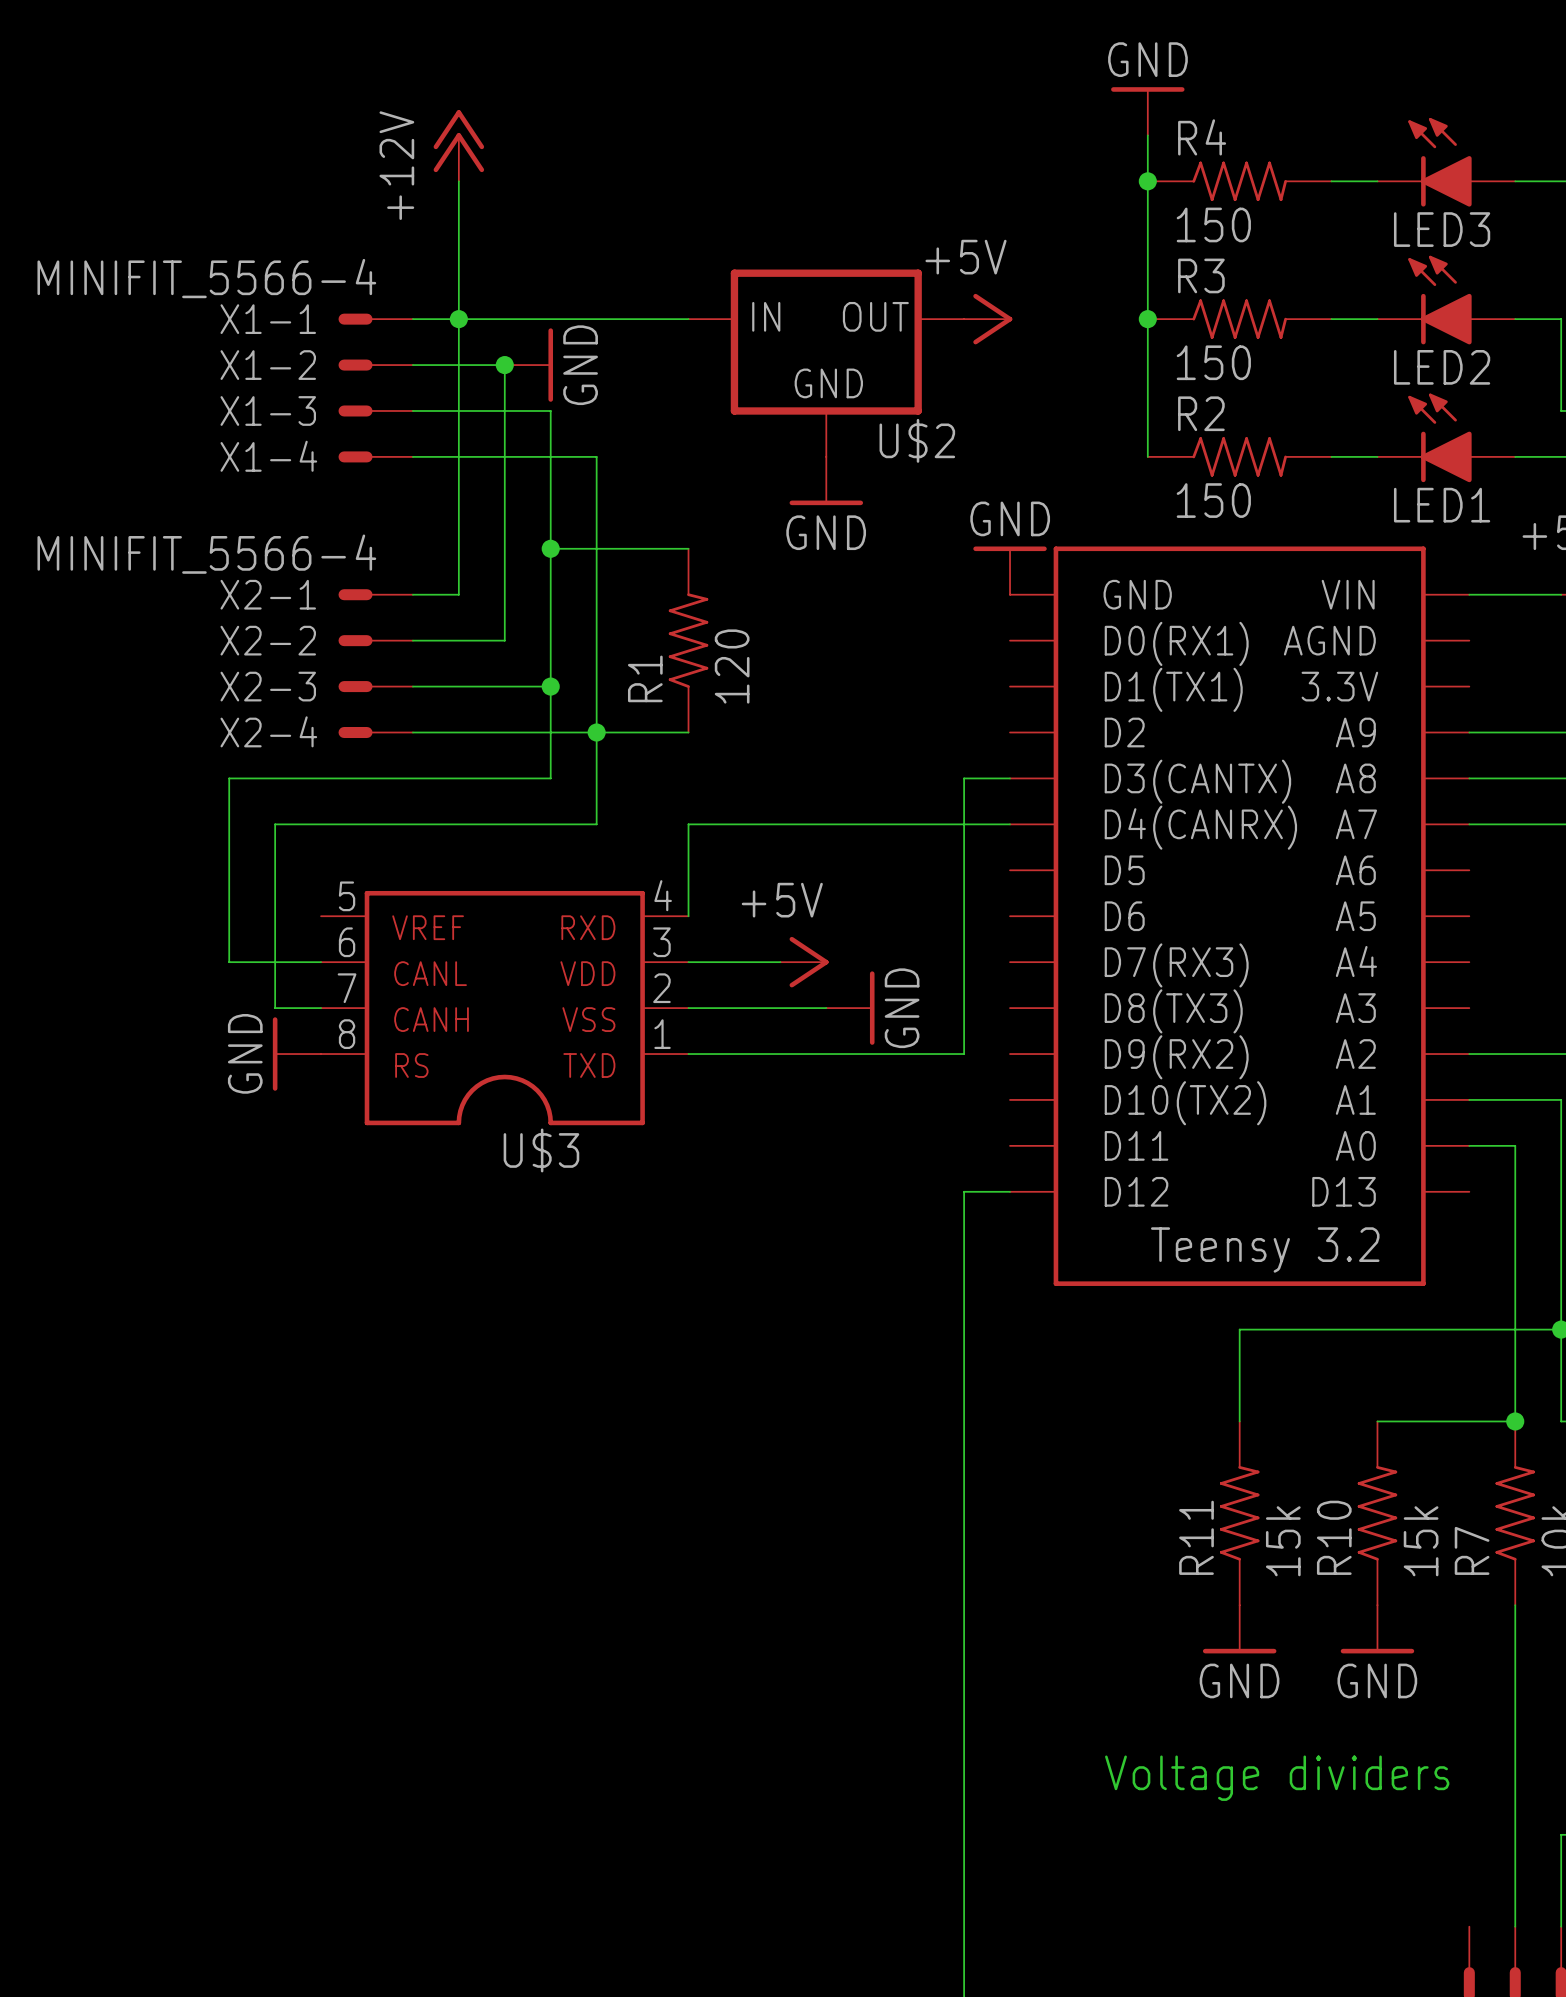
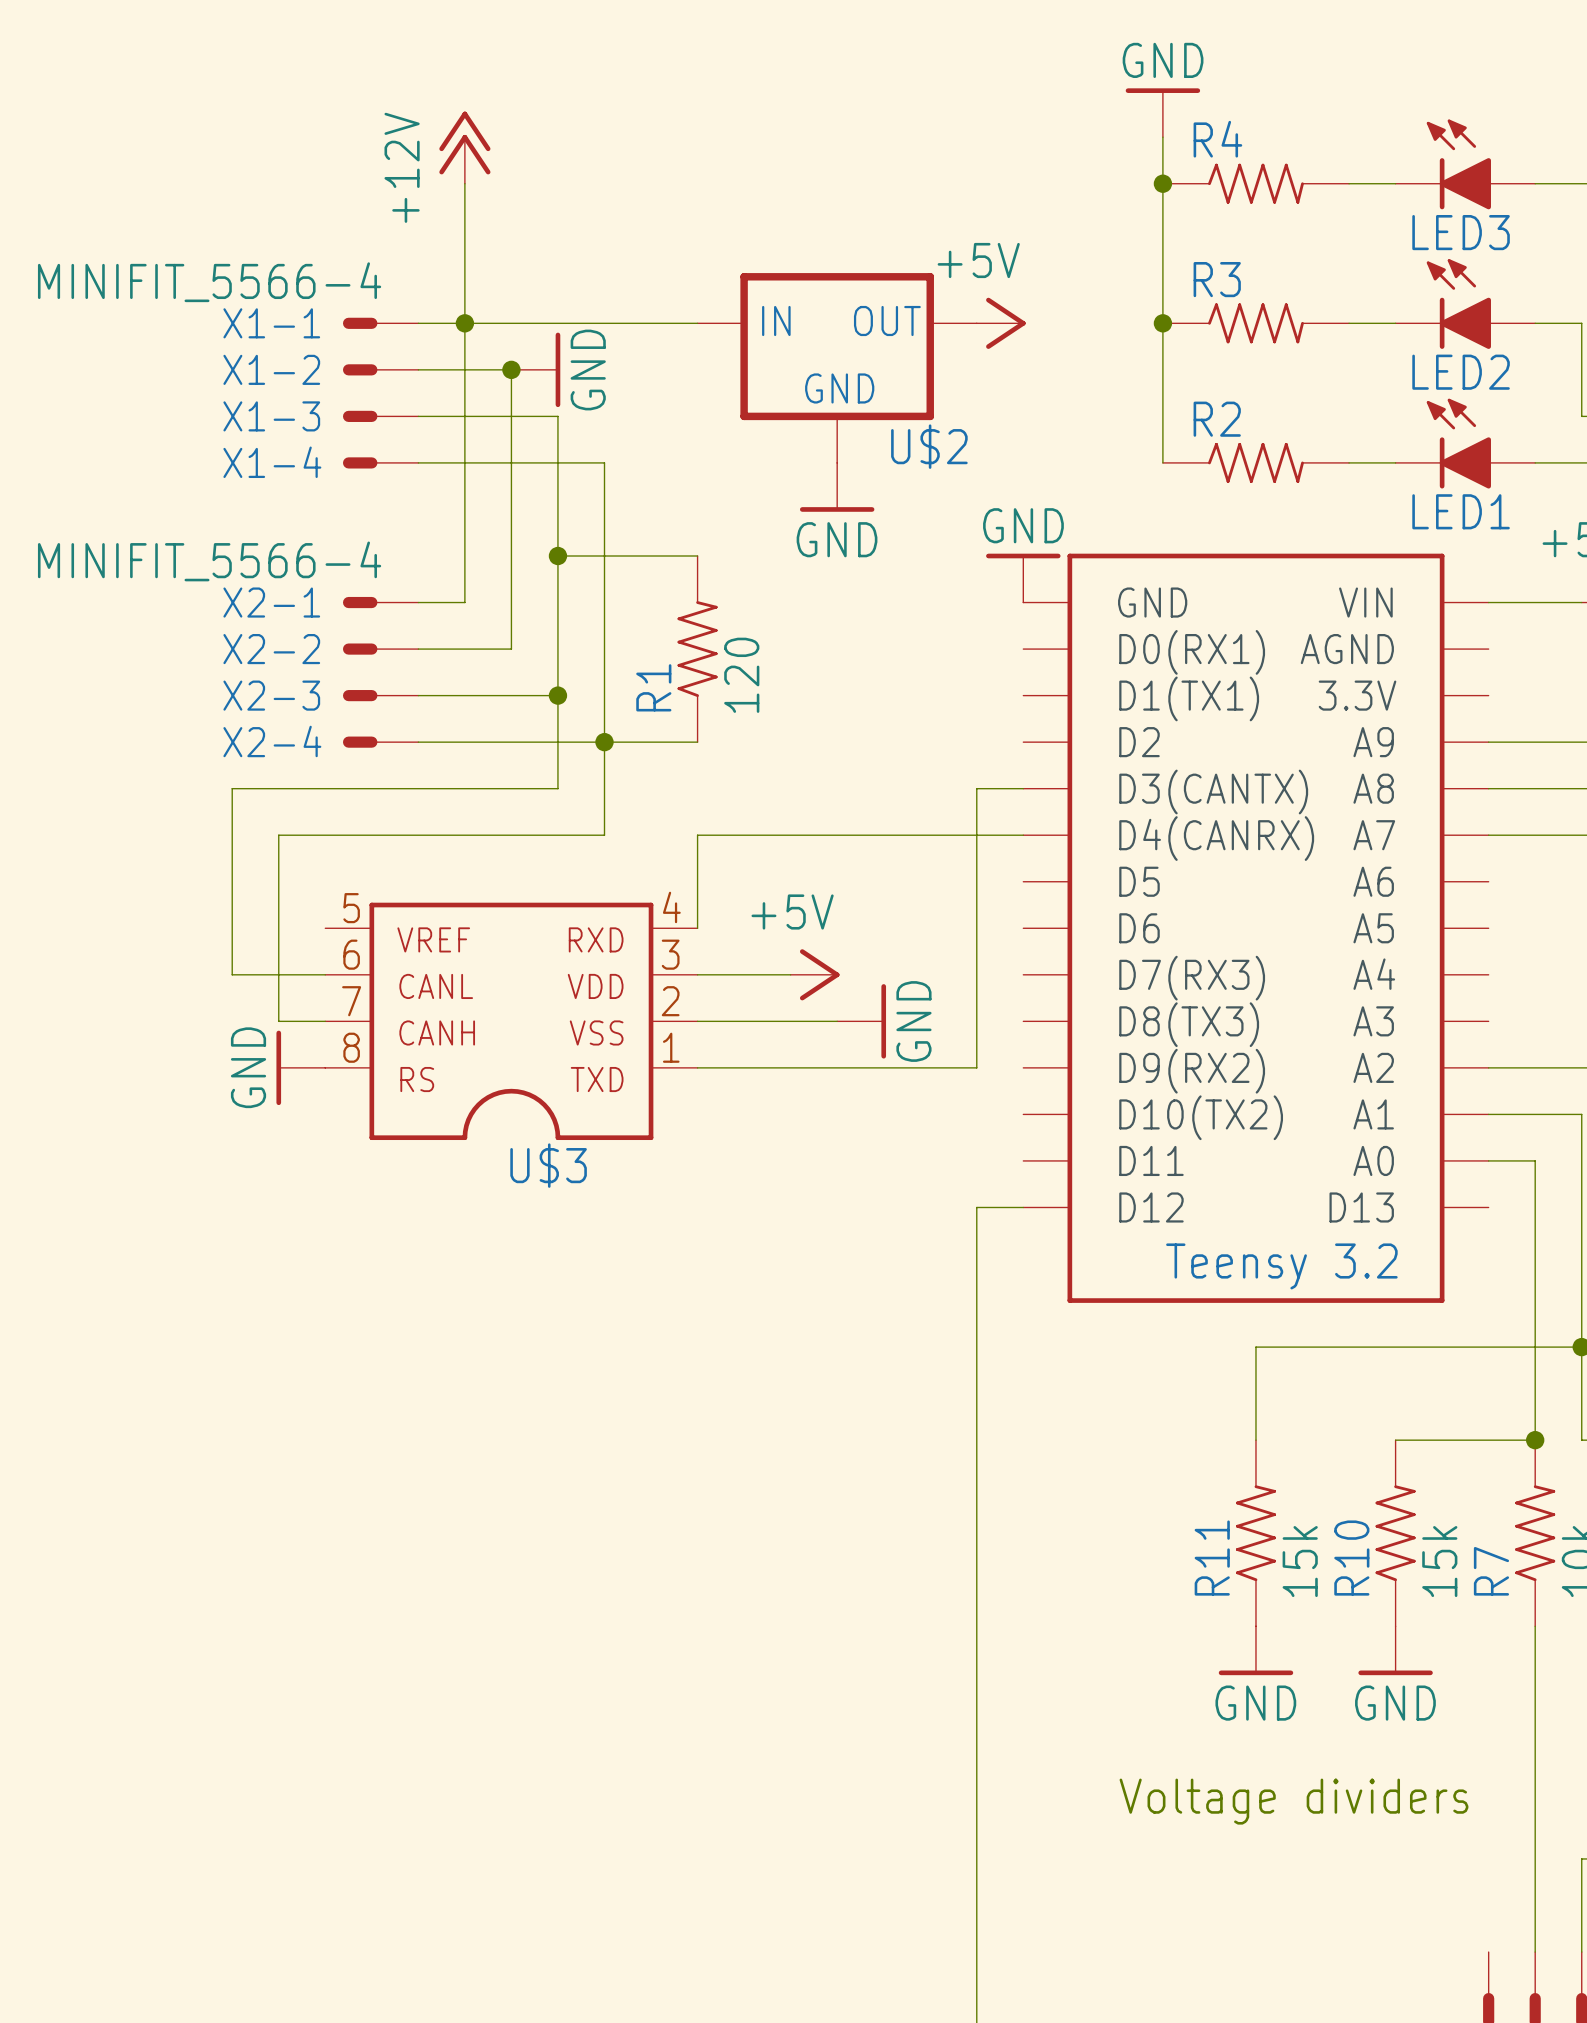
R4 value: 150 (1213, 224) -> none
R3 value: 150 (1213, 362) -> none
R2 value: 150 (1213, 500) -> none

